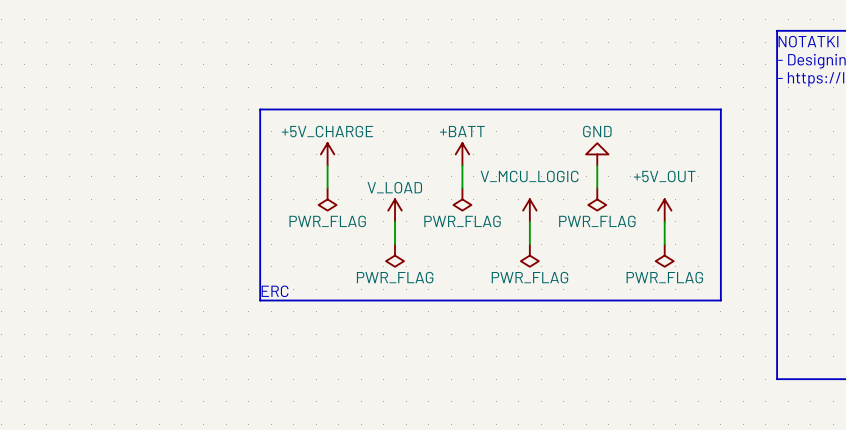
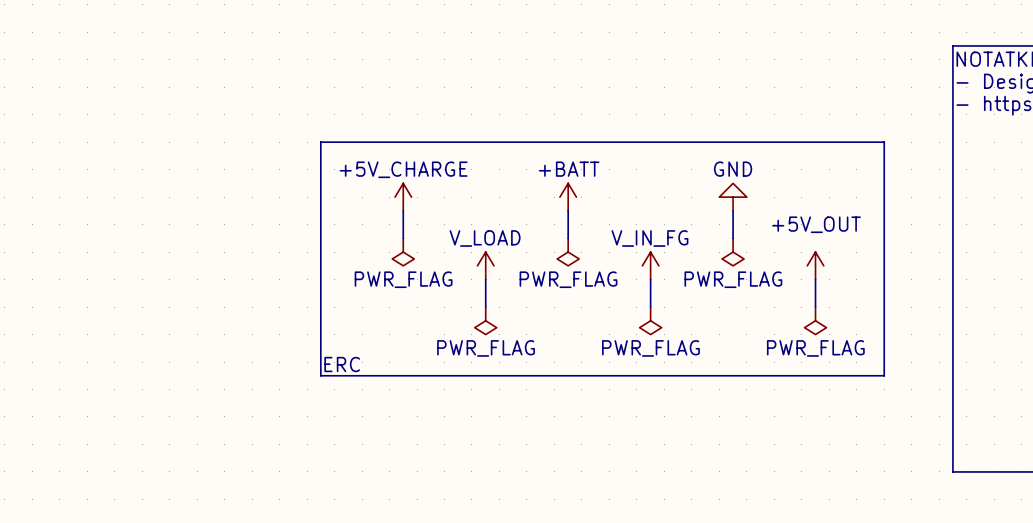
power symbol: V_MCU_LOGIC (529, 210) -> V_IN_FG (650, 265)

